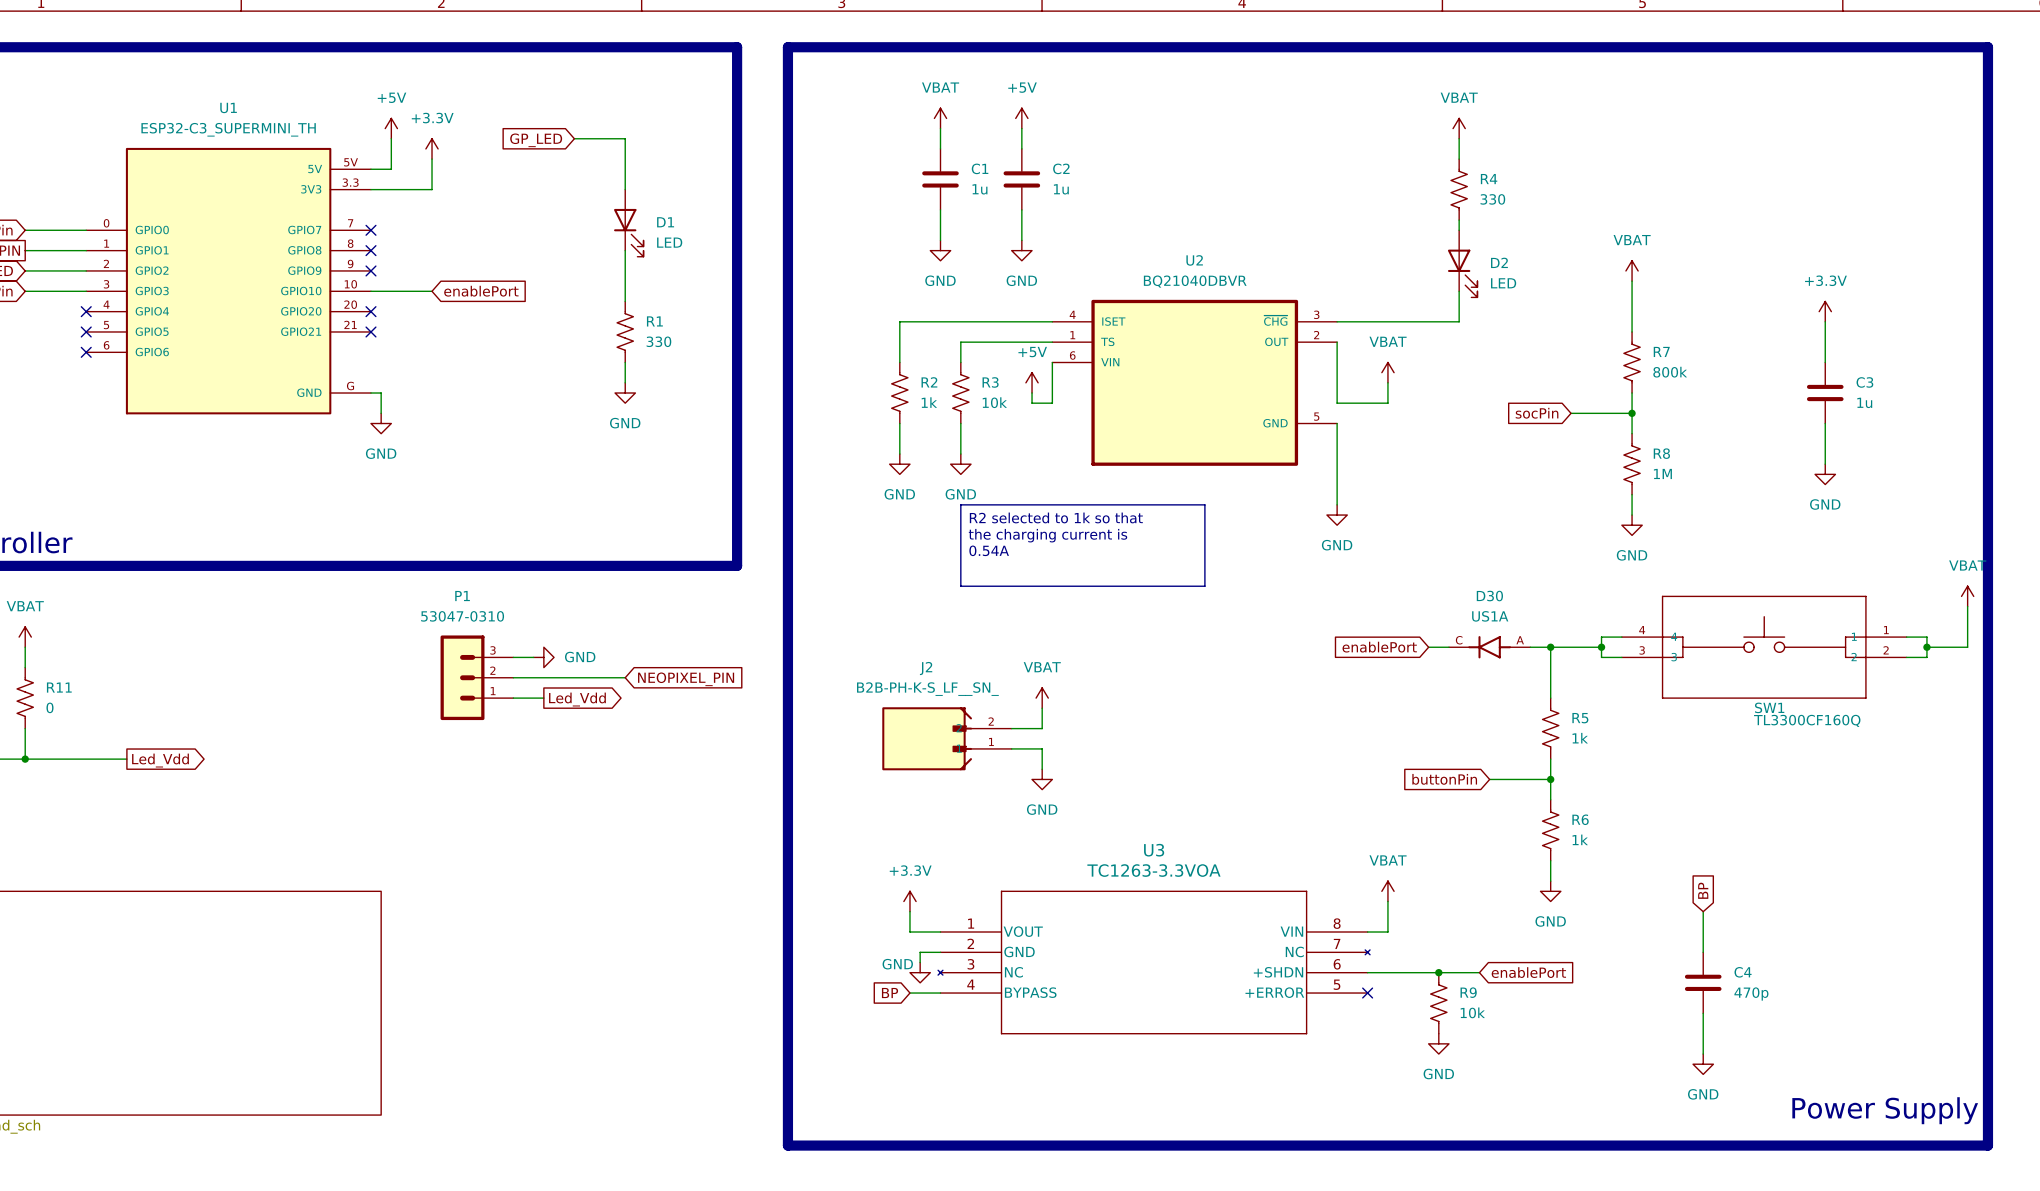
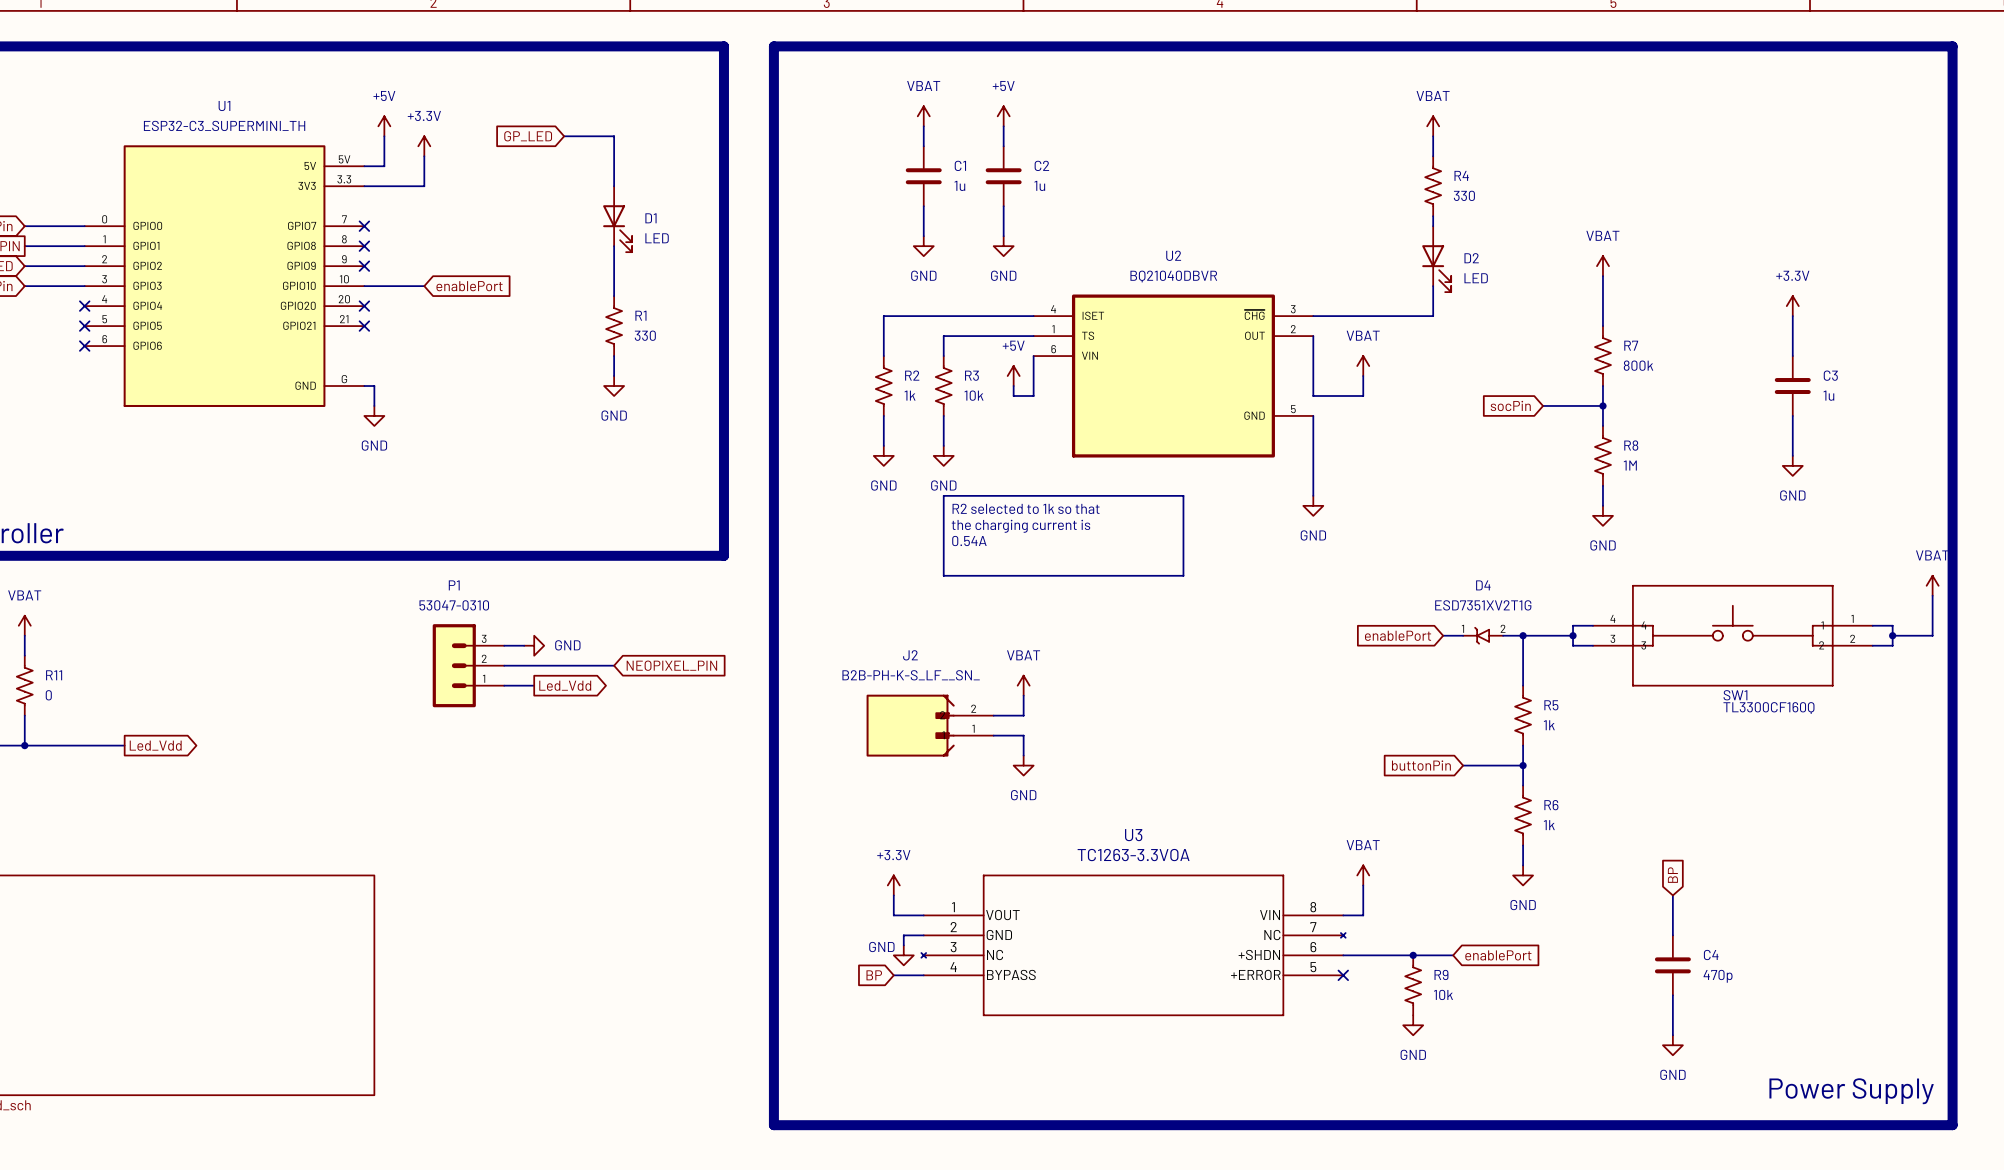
global label position: enablePort (1379, 647) -> enablePort (1398, 635)
D30: US1A (1489, 647) -> none
D4: none -> ESD7351XV2T1G (1483, 635)

